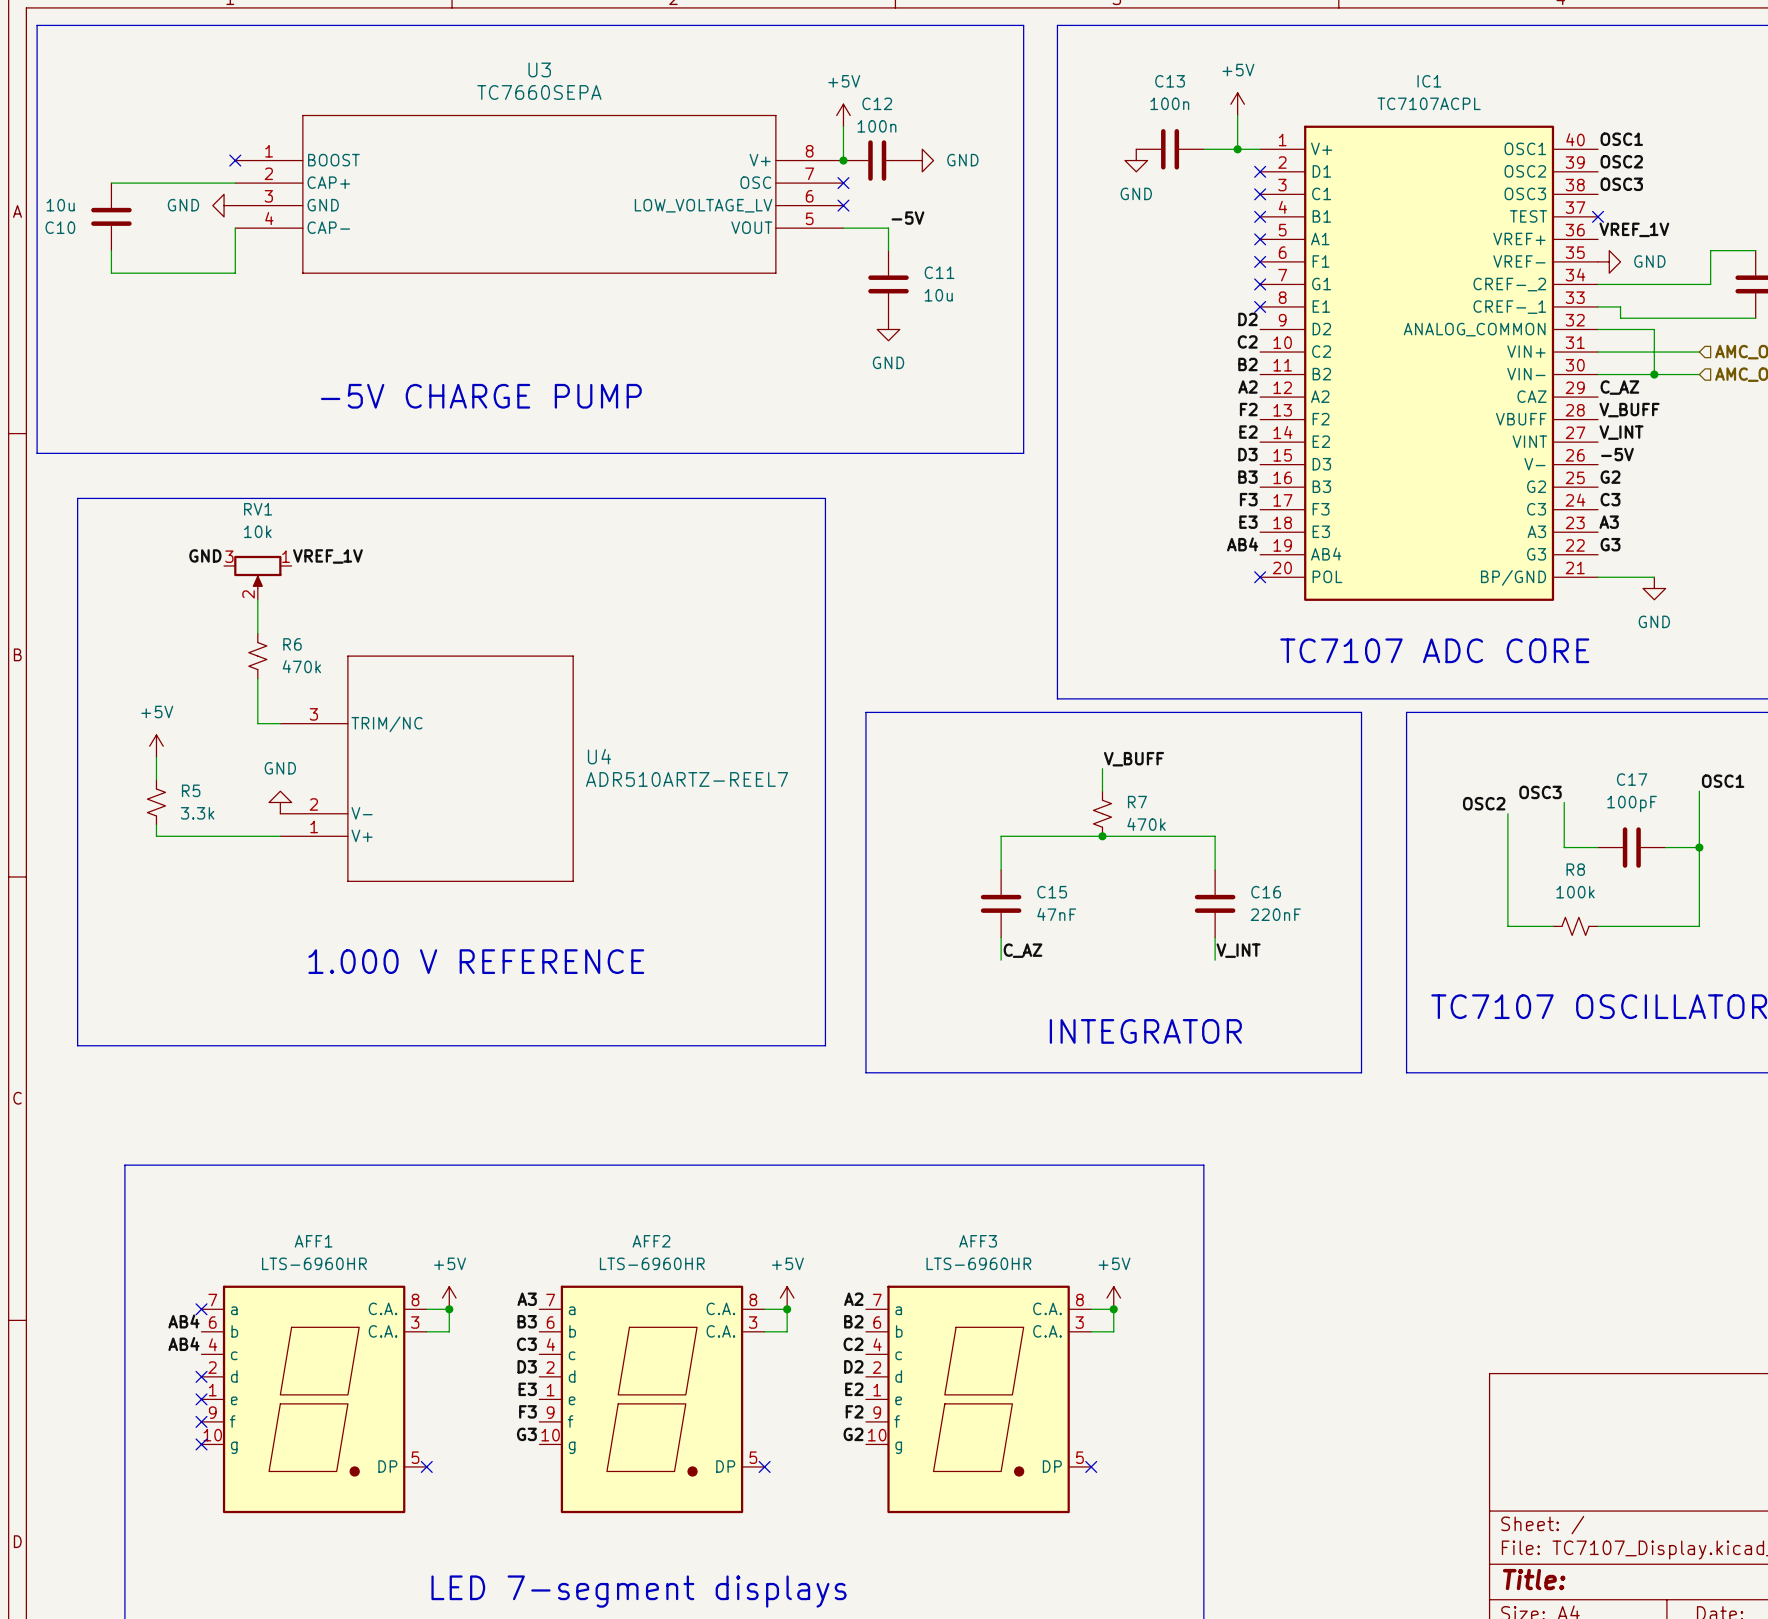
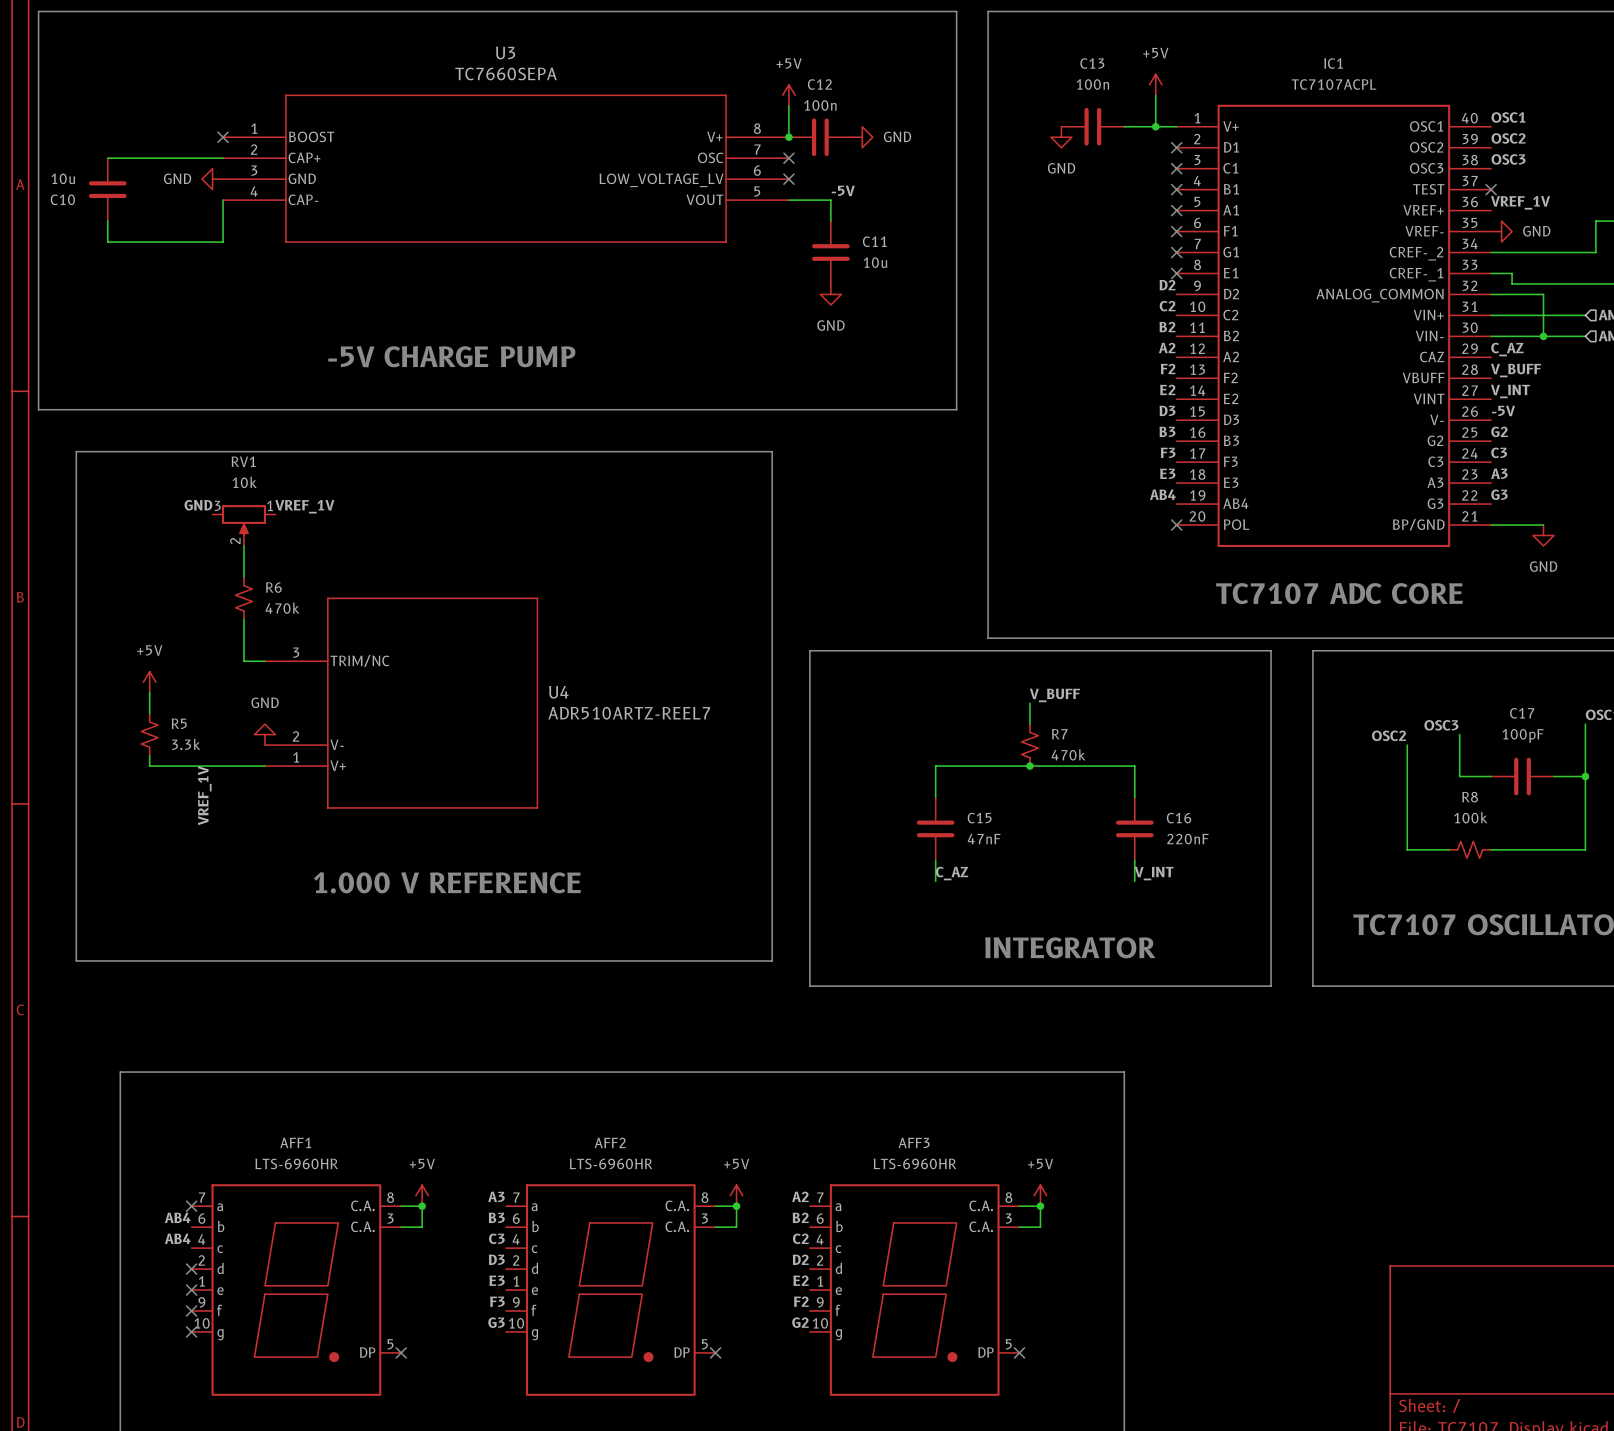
label: none -> VREF_1V (204, 795)

